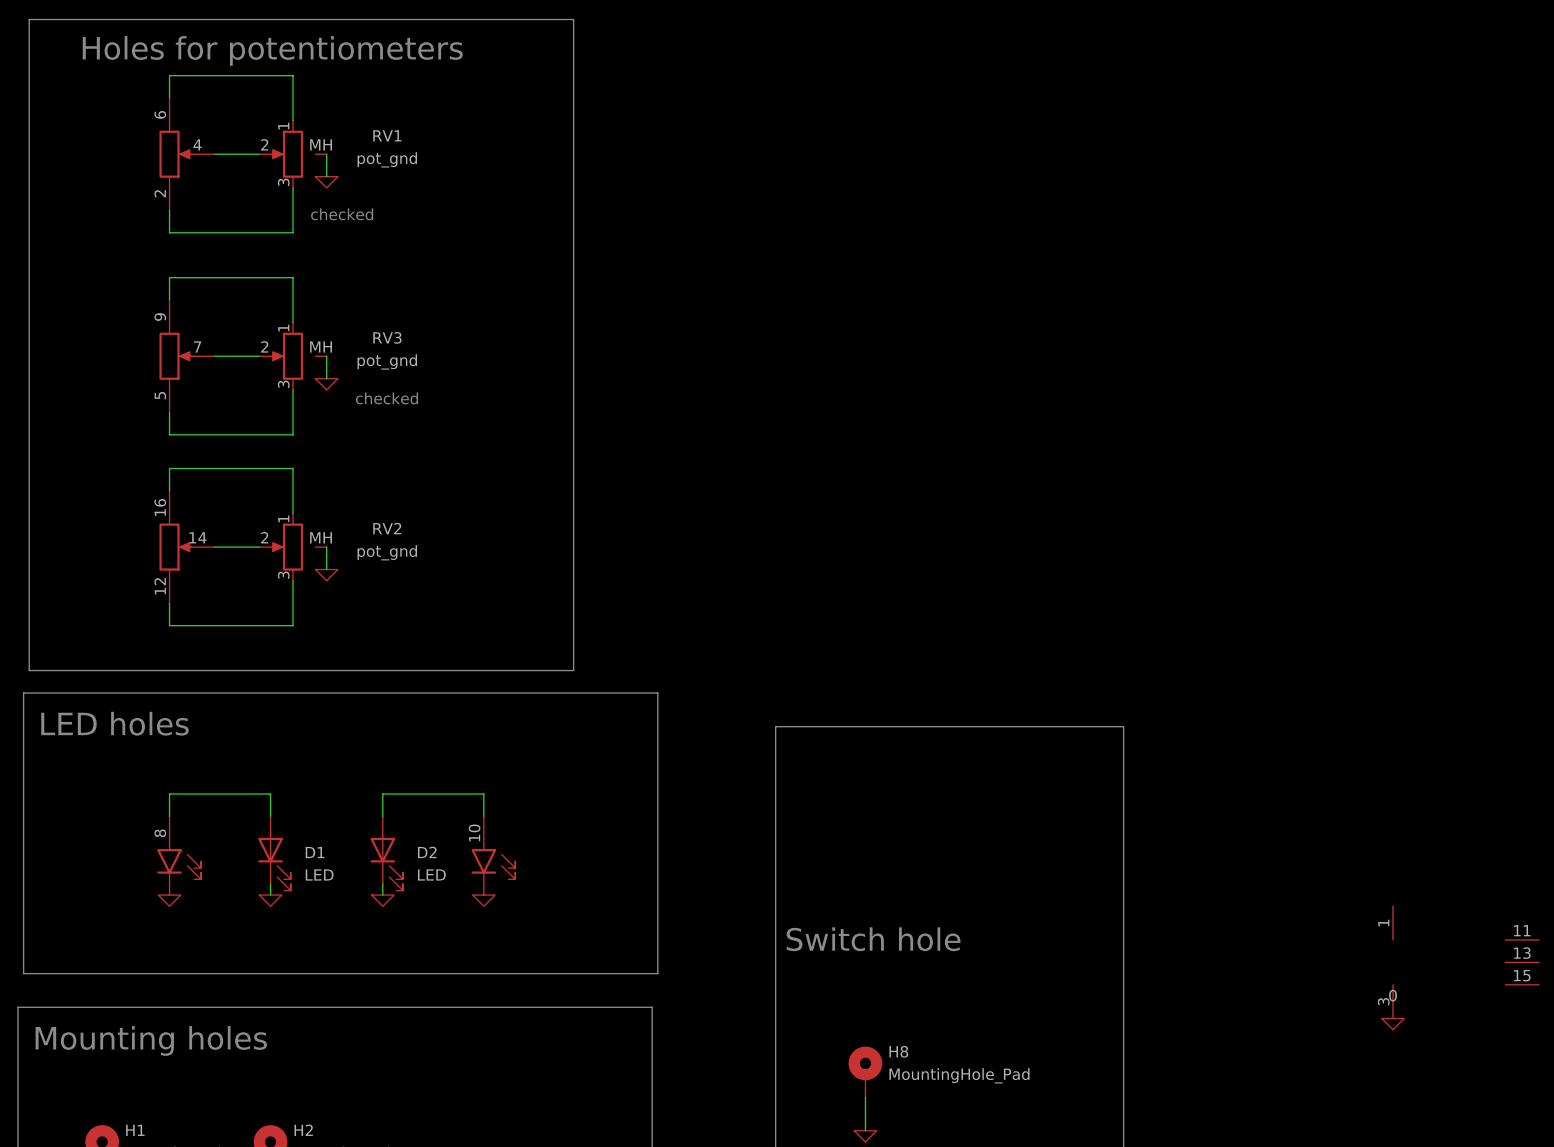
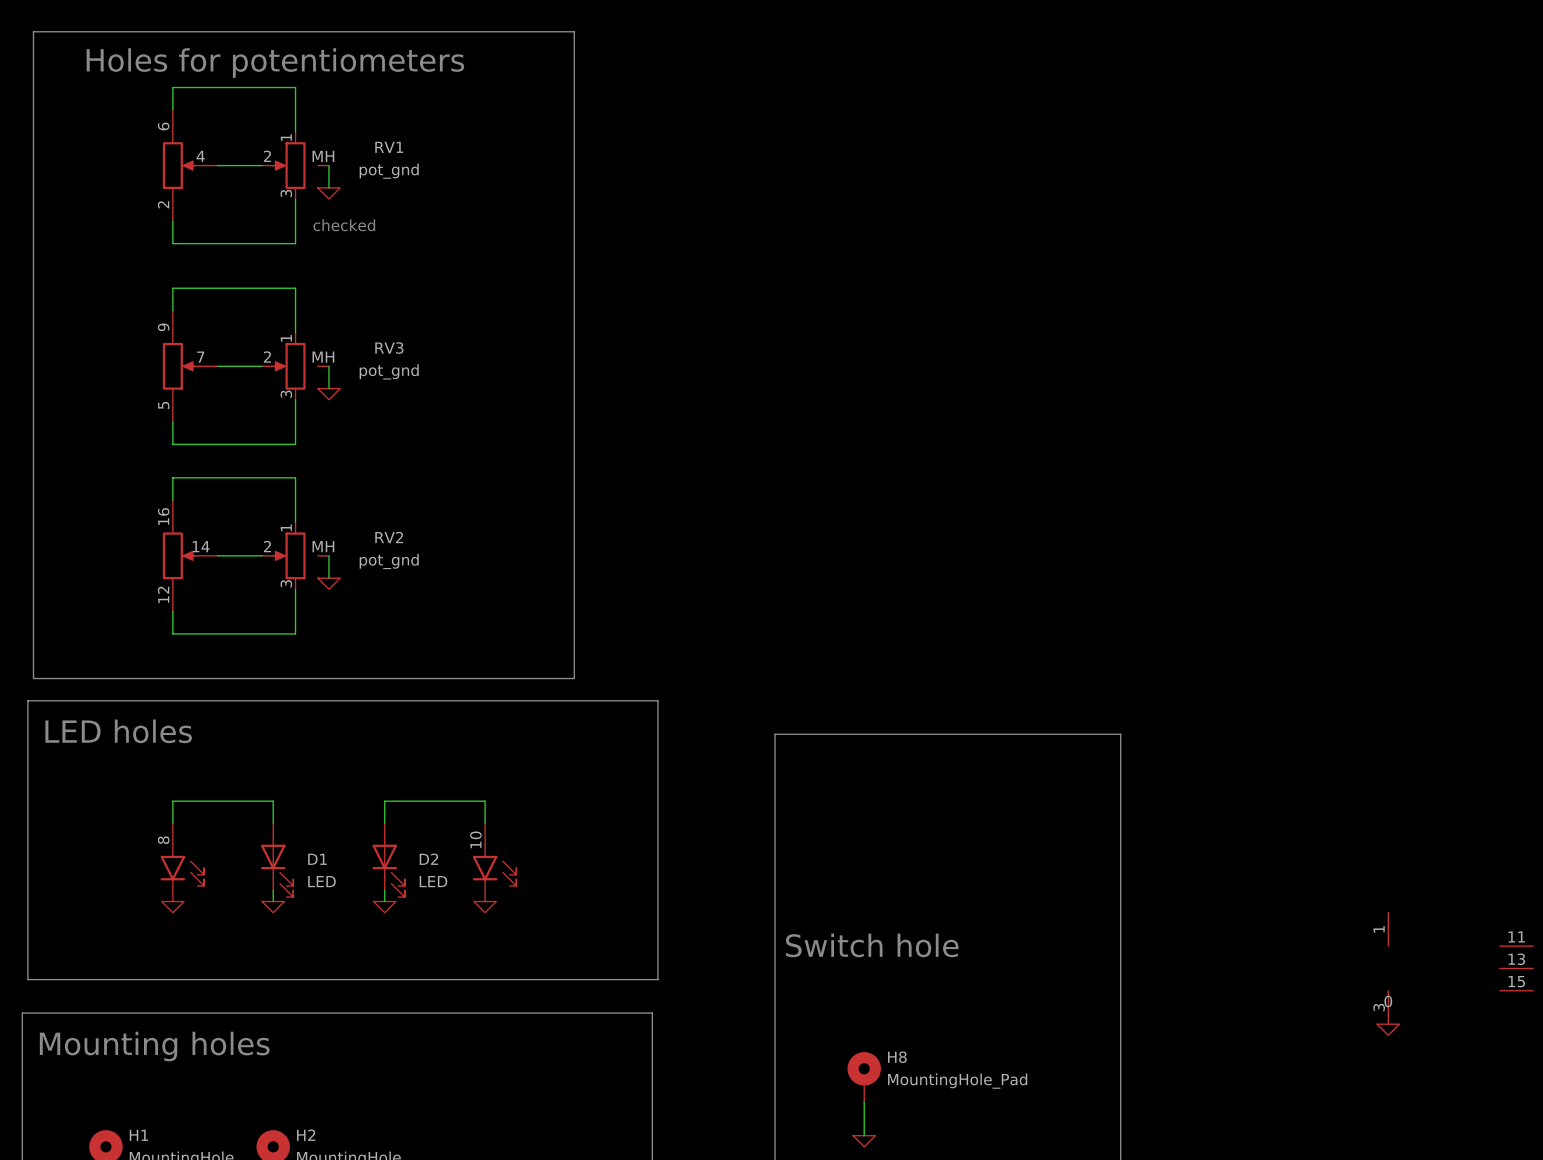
text: checked (387, 398) -> none

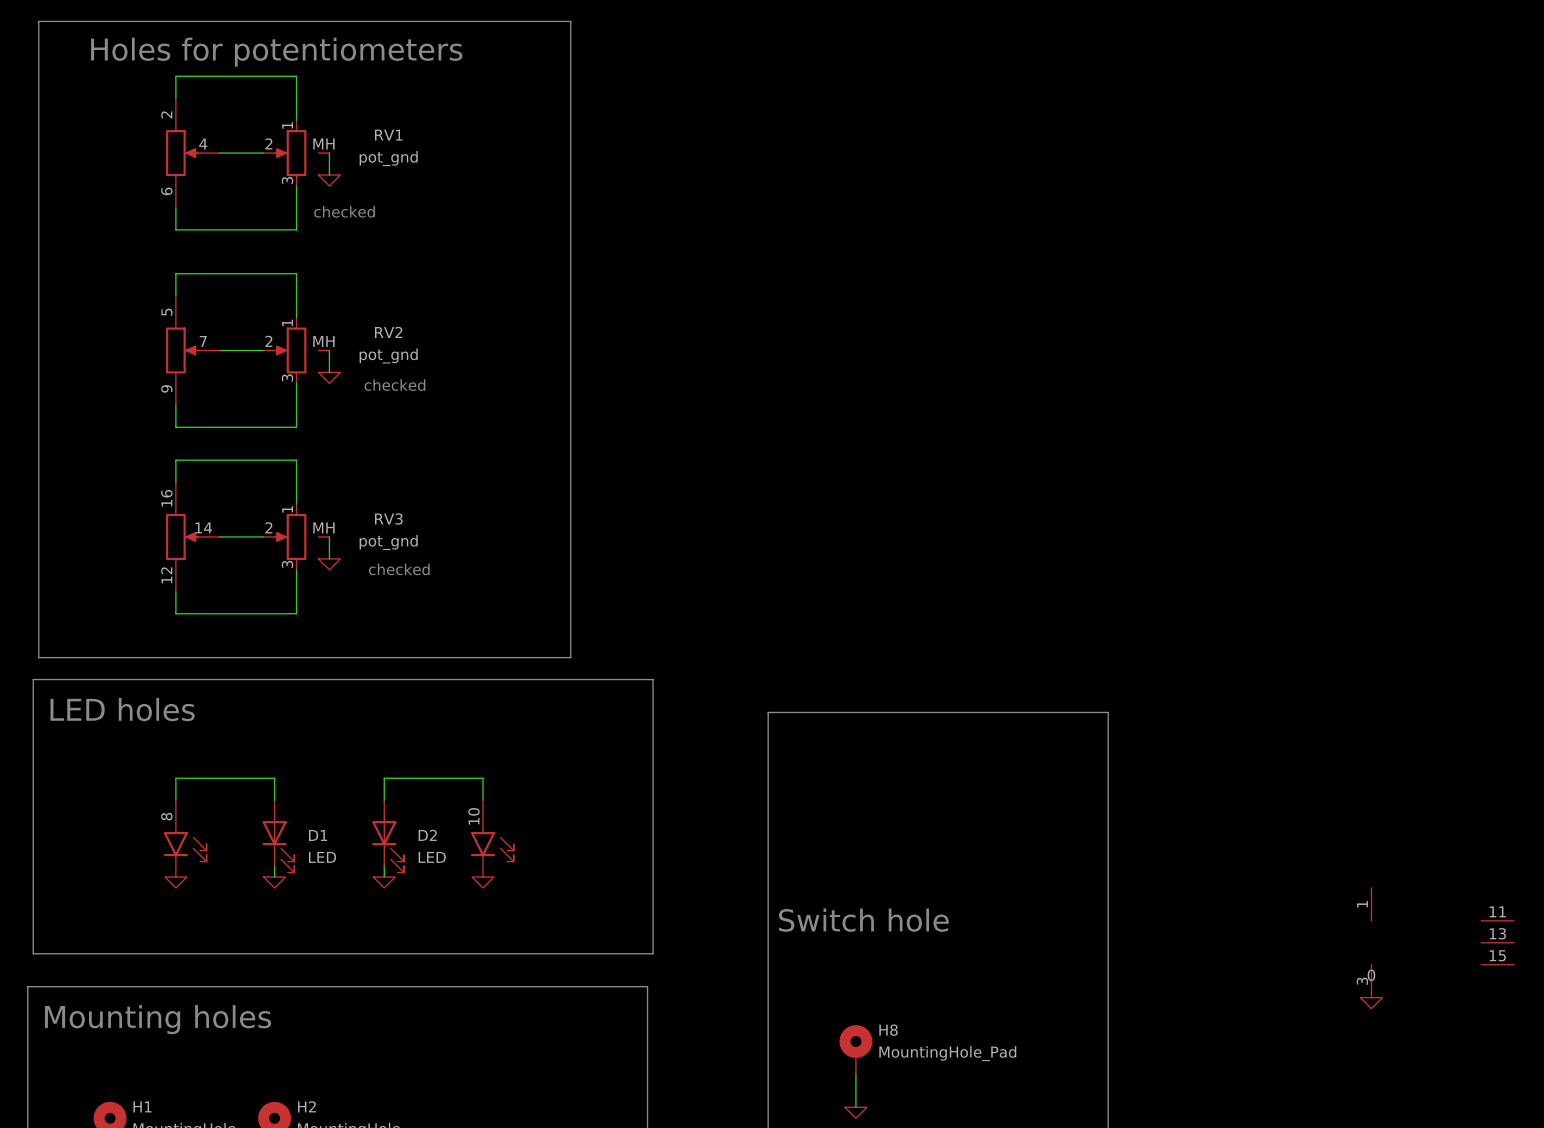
part flip: as is (179, 165) -> up-down (181, 153)
RV3 name: RV3 (389, 348) -> RV2 (388, 332)
part flip: as is (179, 366) -> up-down (181, 350)
text: none -> checked (394, 385)
RV2 name: RV2 (389, 537) -> RV3 (388, 519)
text: none -> checked (399, 569)

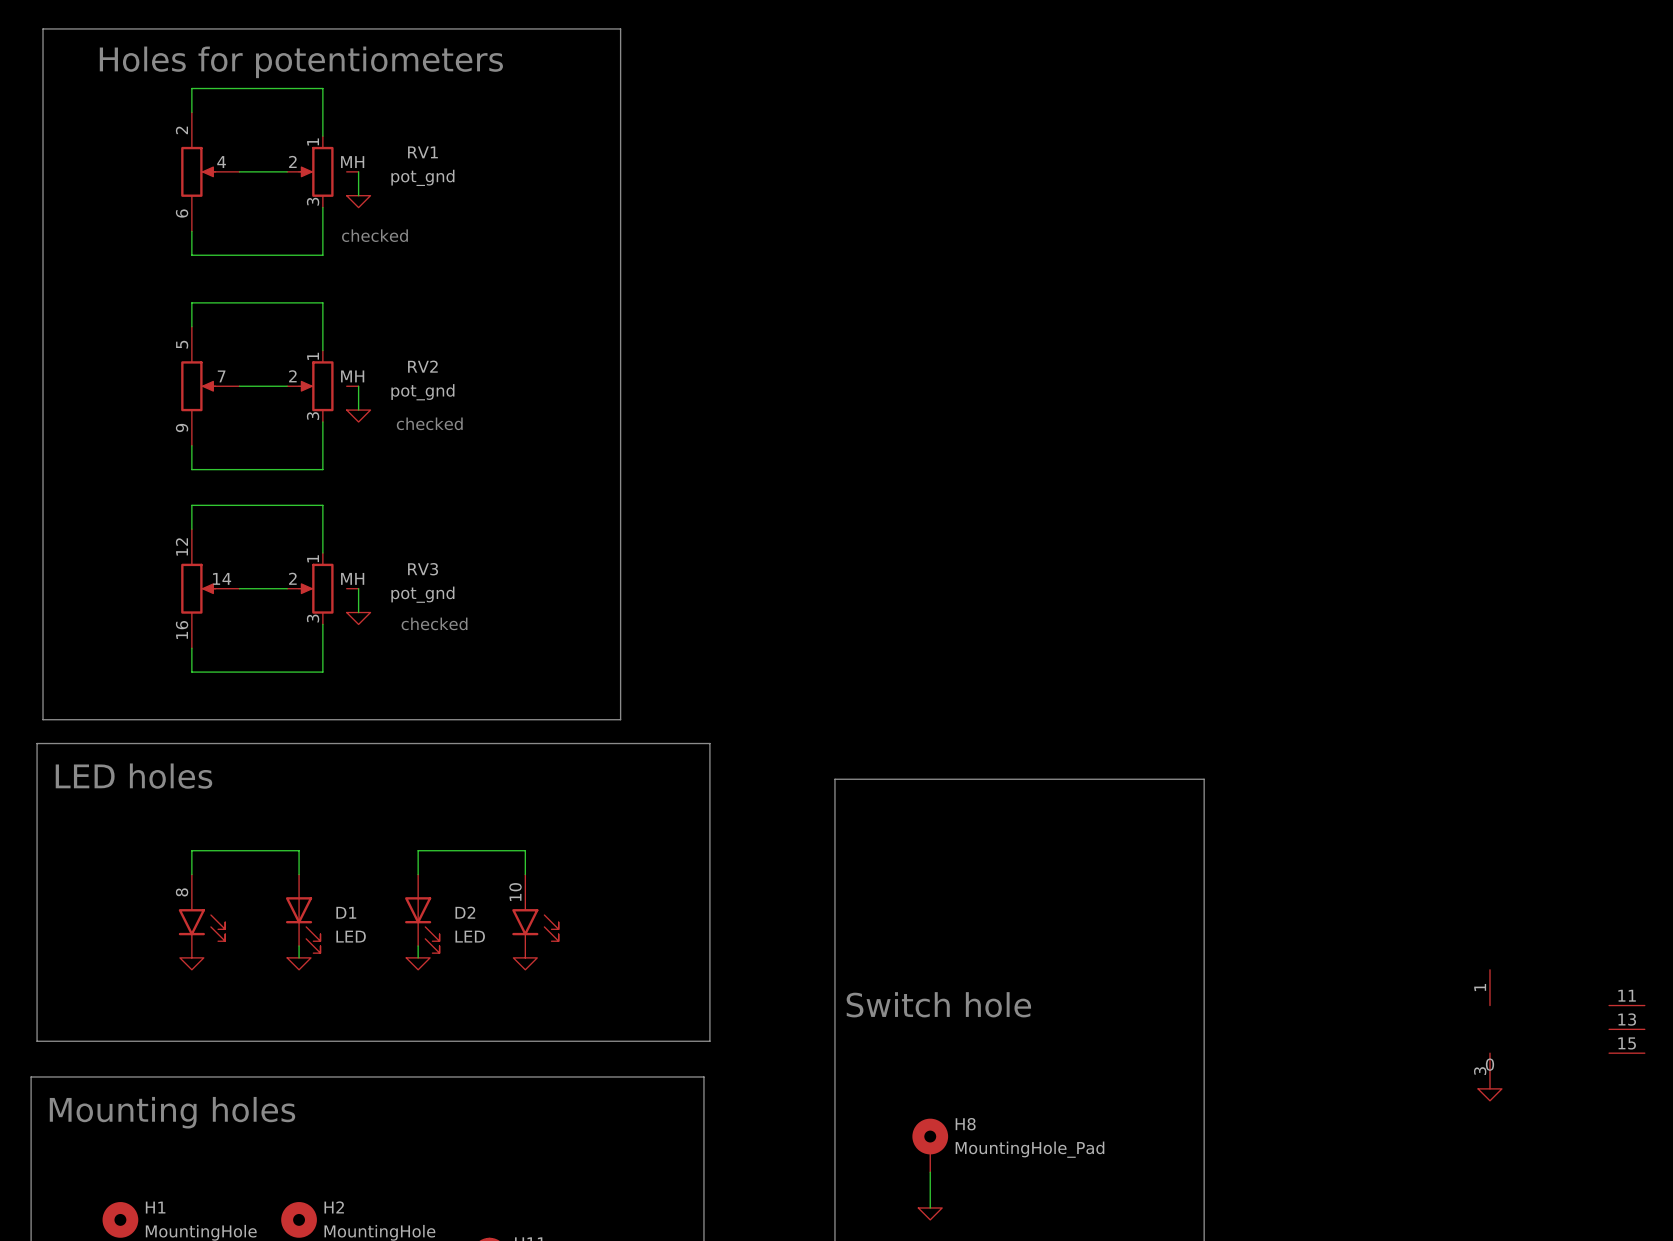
part flip: as is (181, 536) -> up-down (198, 588)

